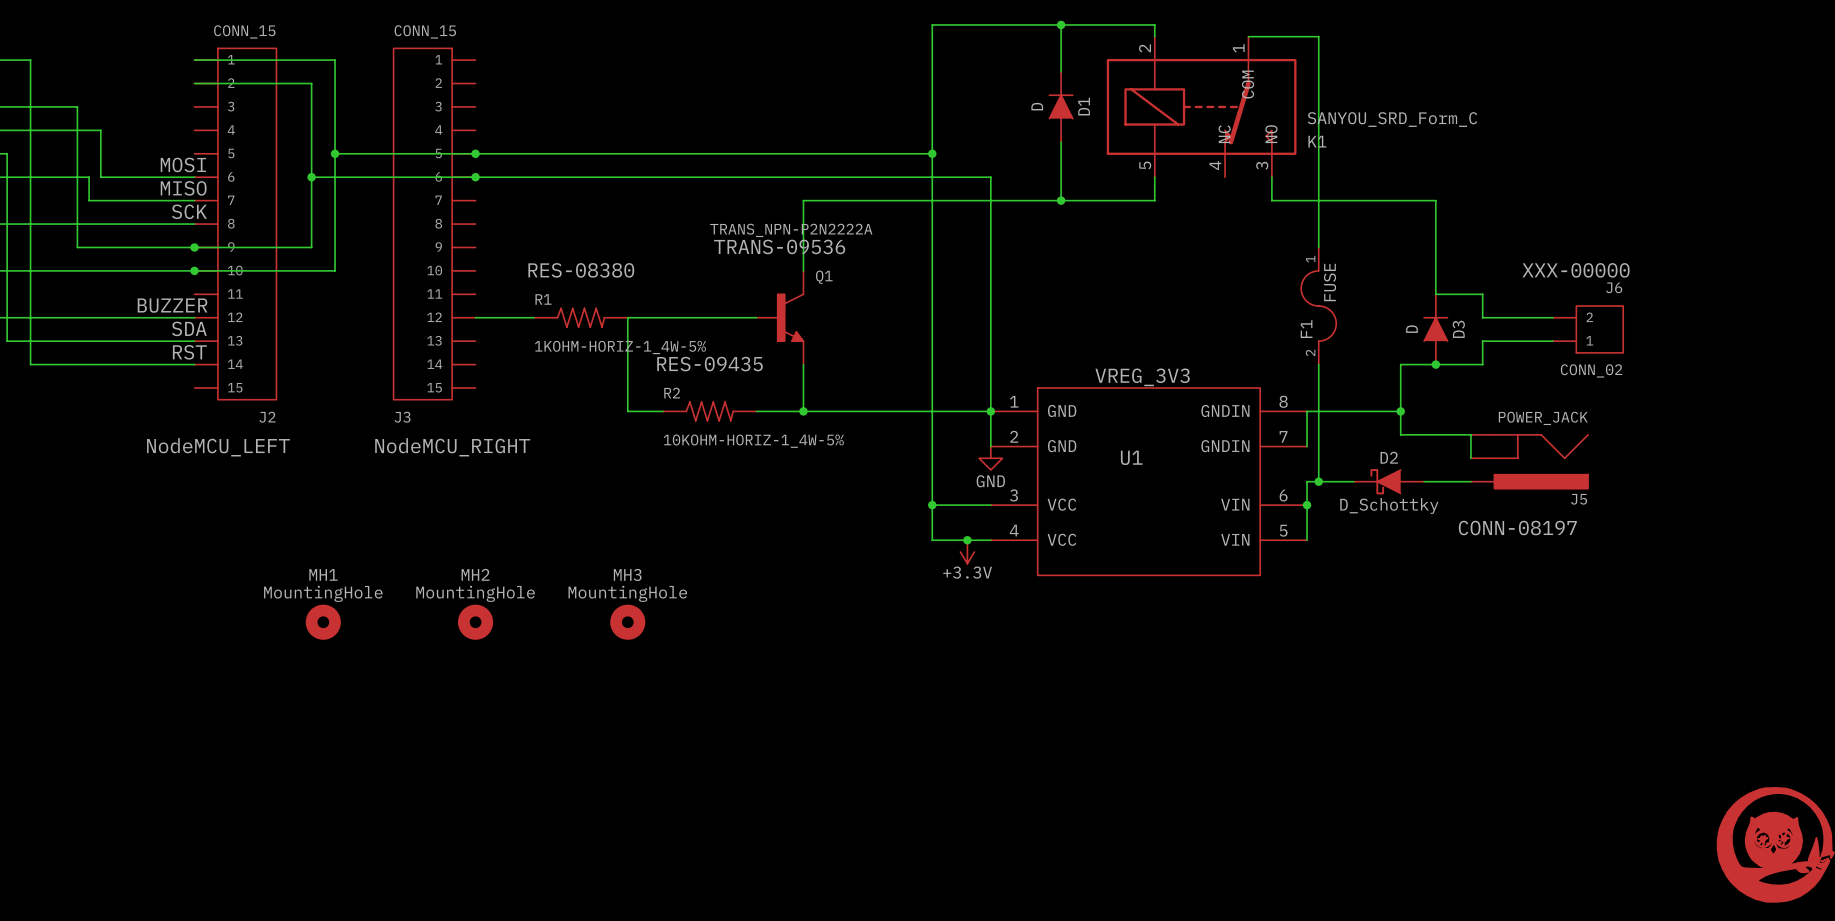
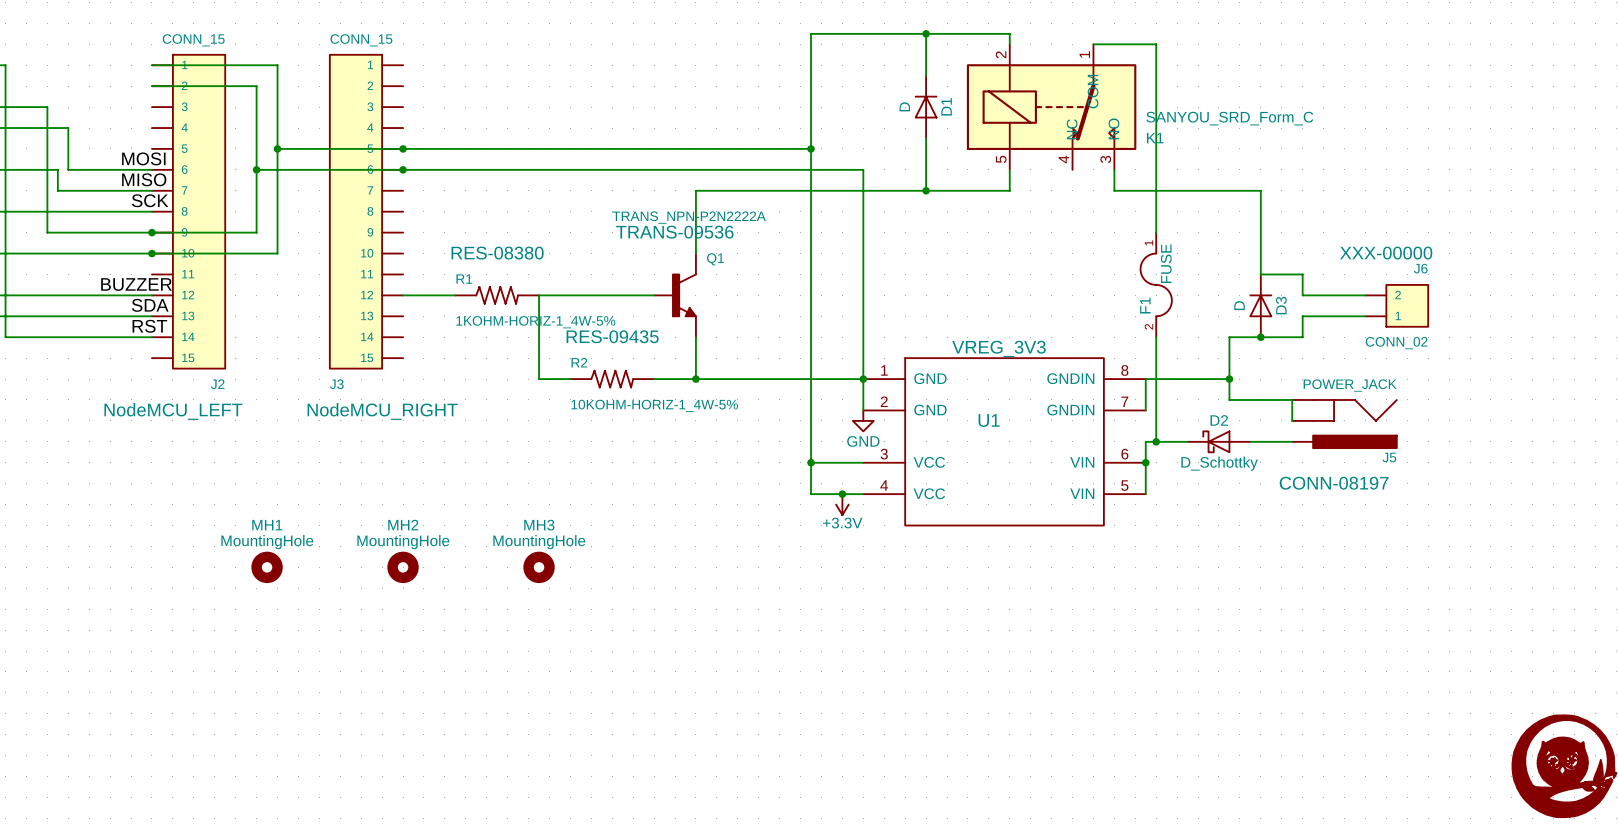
D1 symbol: [1048, 71, 1074, 143] -> [914, 75, 938, 139]
D3 symbol: [1423, 294, 1449, 365] -> [1249, 274, 1273, 338]
D2 symbol: [1353, 469, 1425, 495] -> [1187, 430, 1251, 454]

